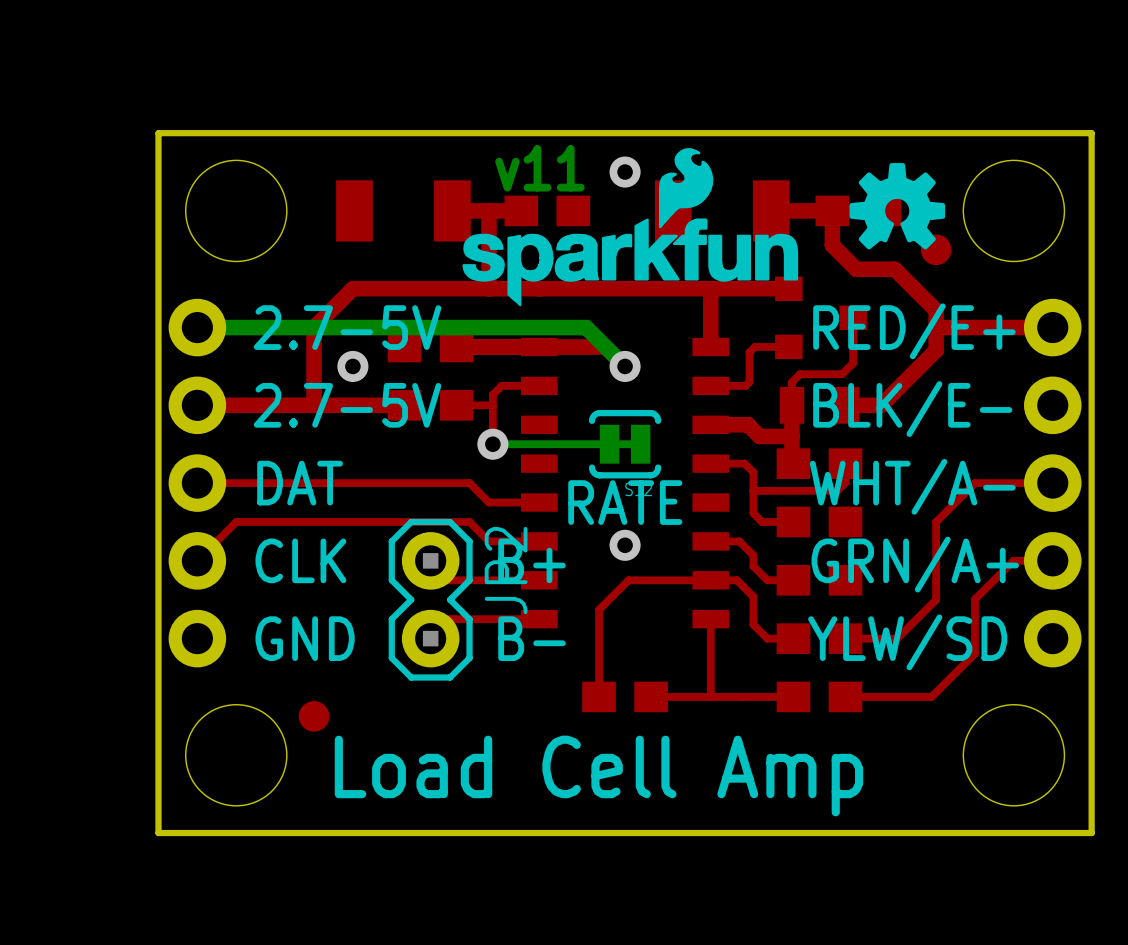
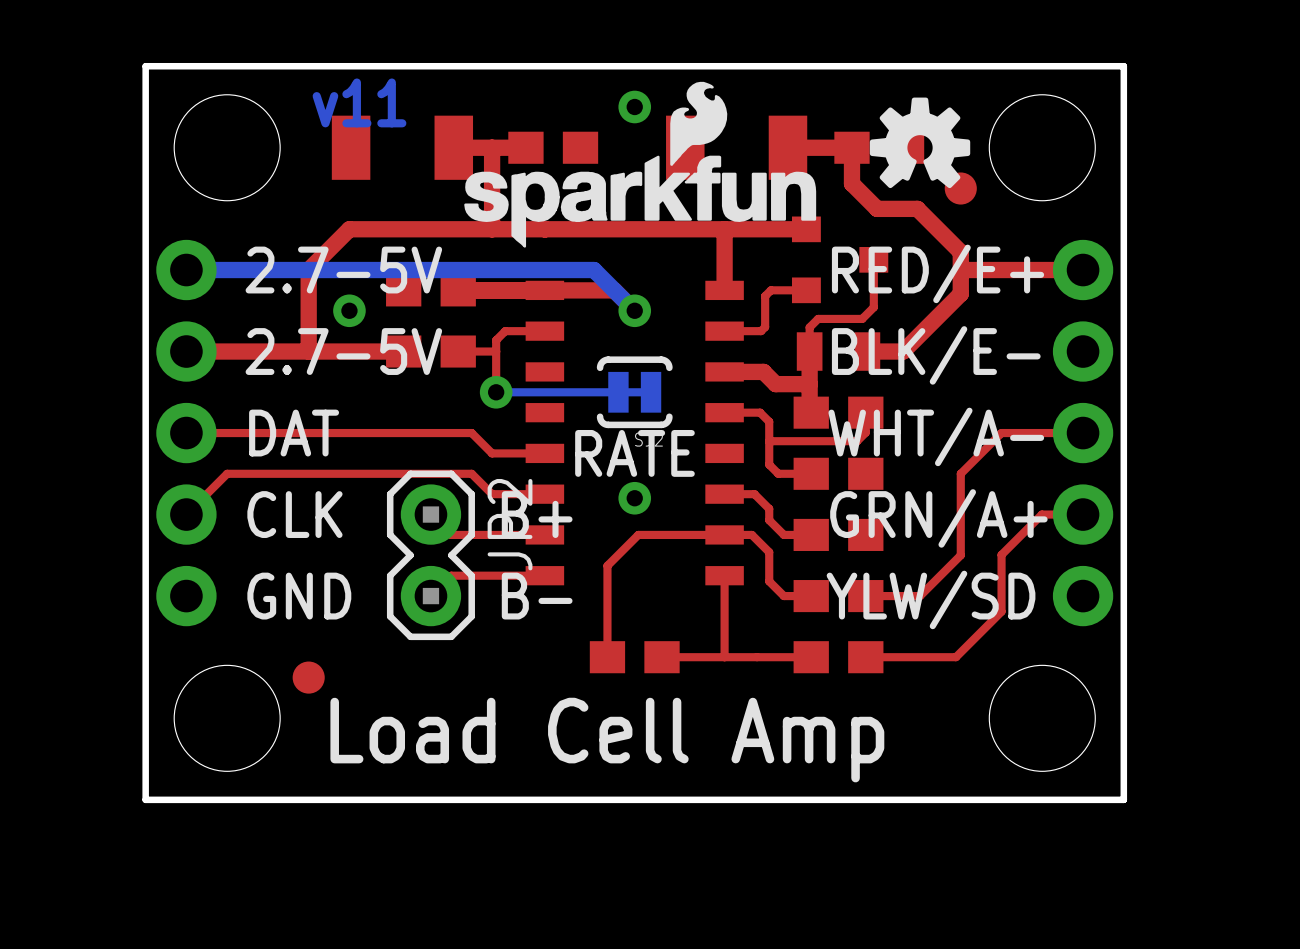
drawing: none -> [312, 78, 407, 128]
text: v11 (539, 168) -> none

